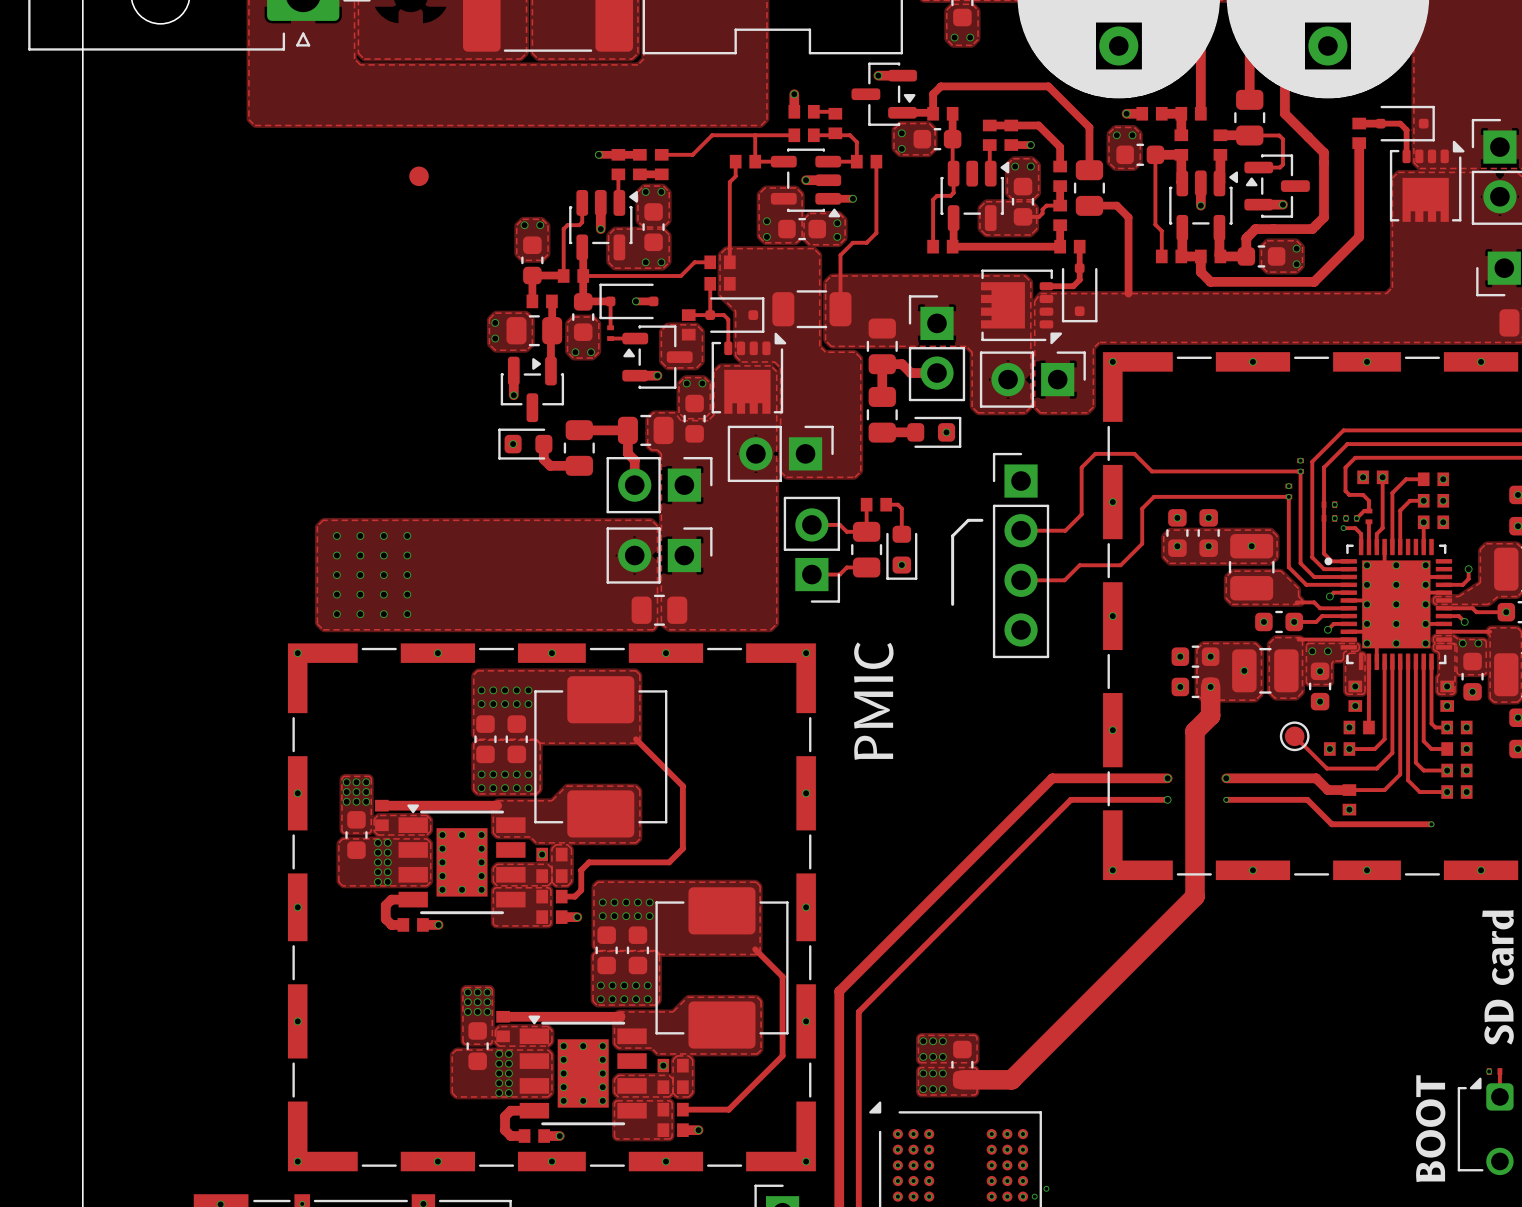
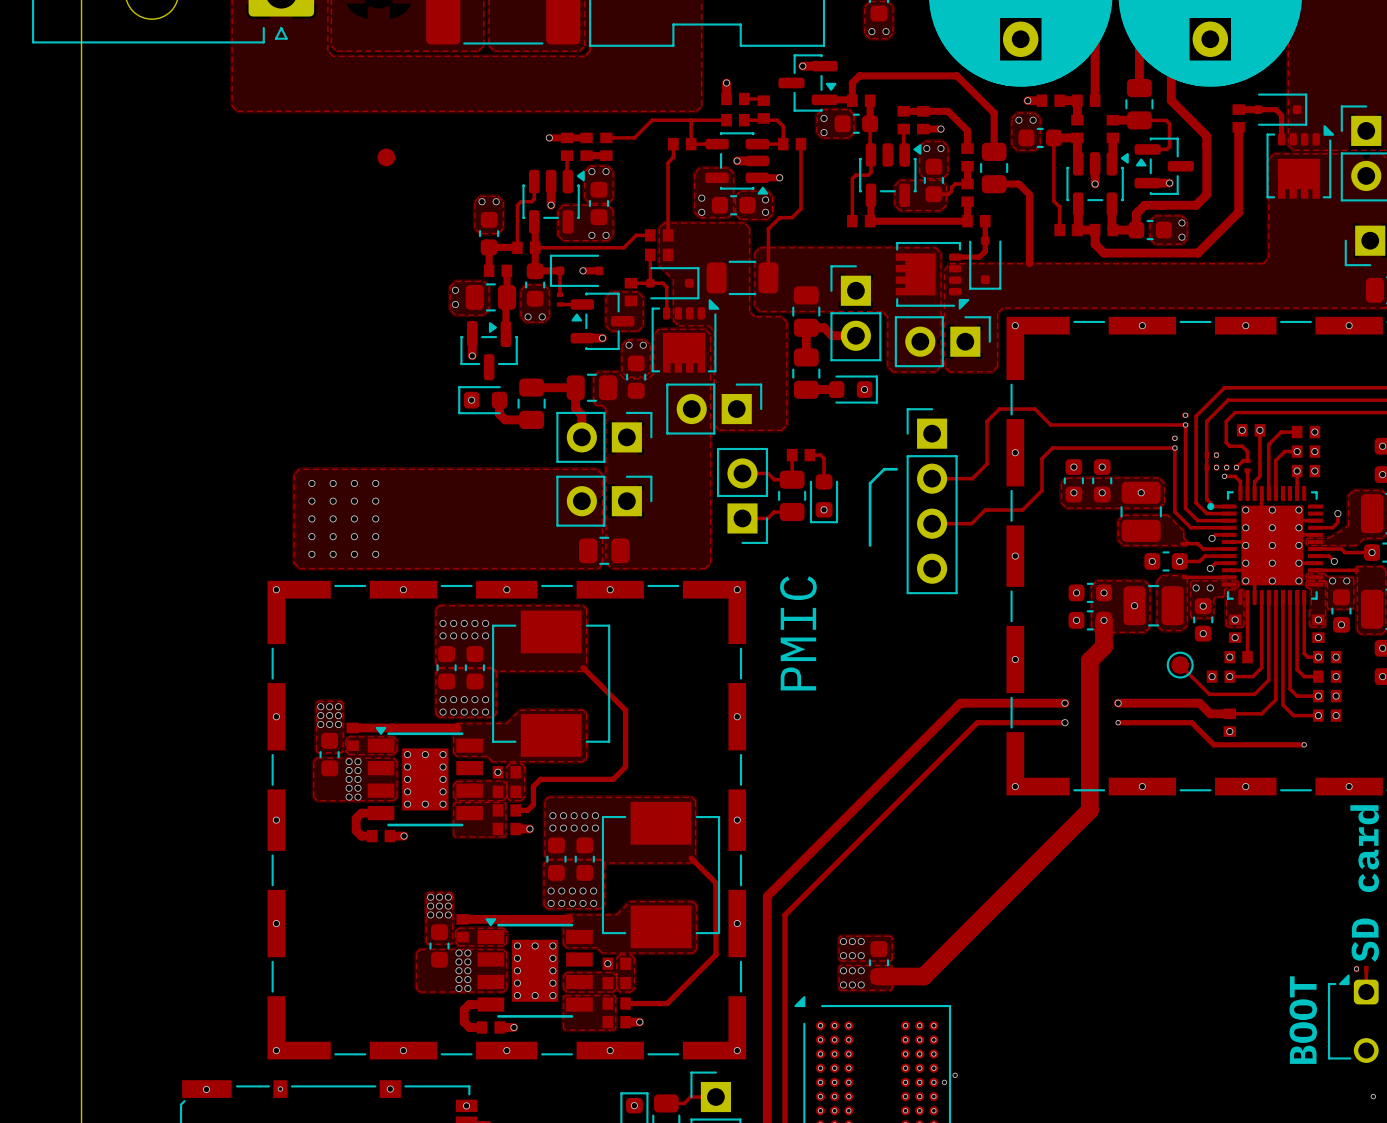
part footprint: [534, 676, 668, 838] -> [492, 610, 611, 757]
part footprint: [655, 887, 789, 1049] -> [601, 801, 721, 949]

